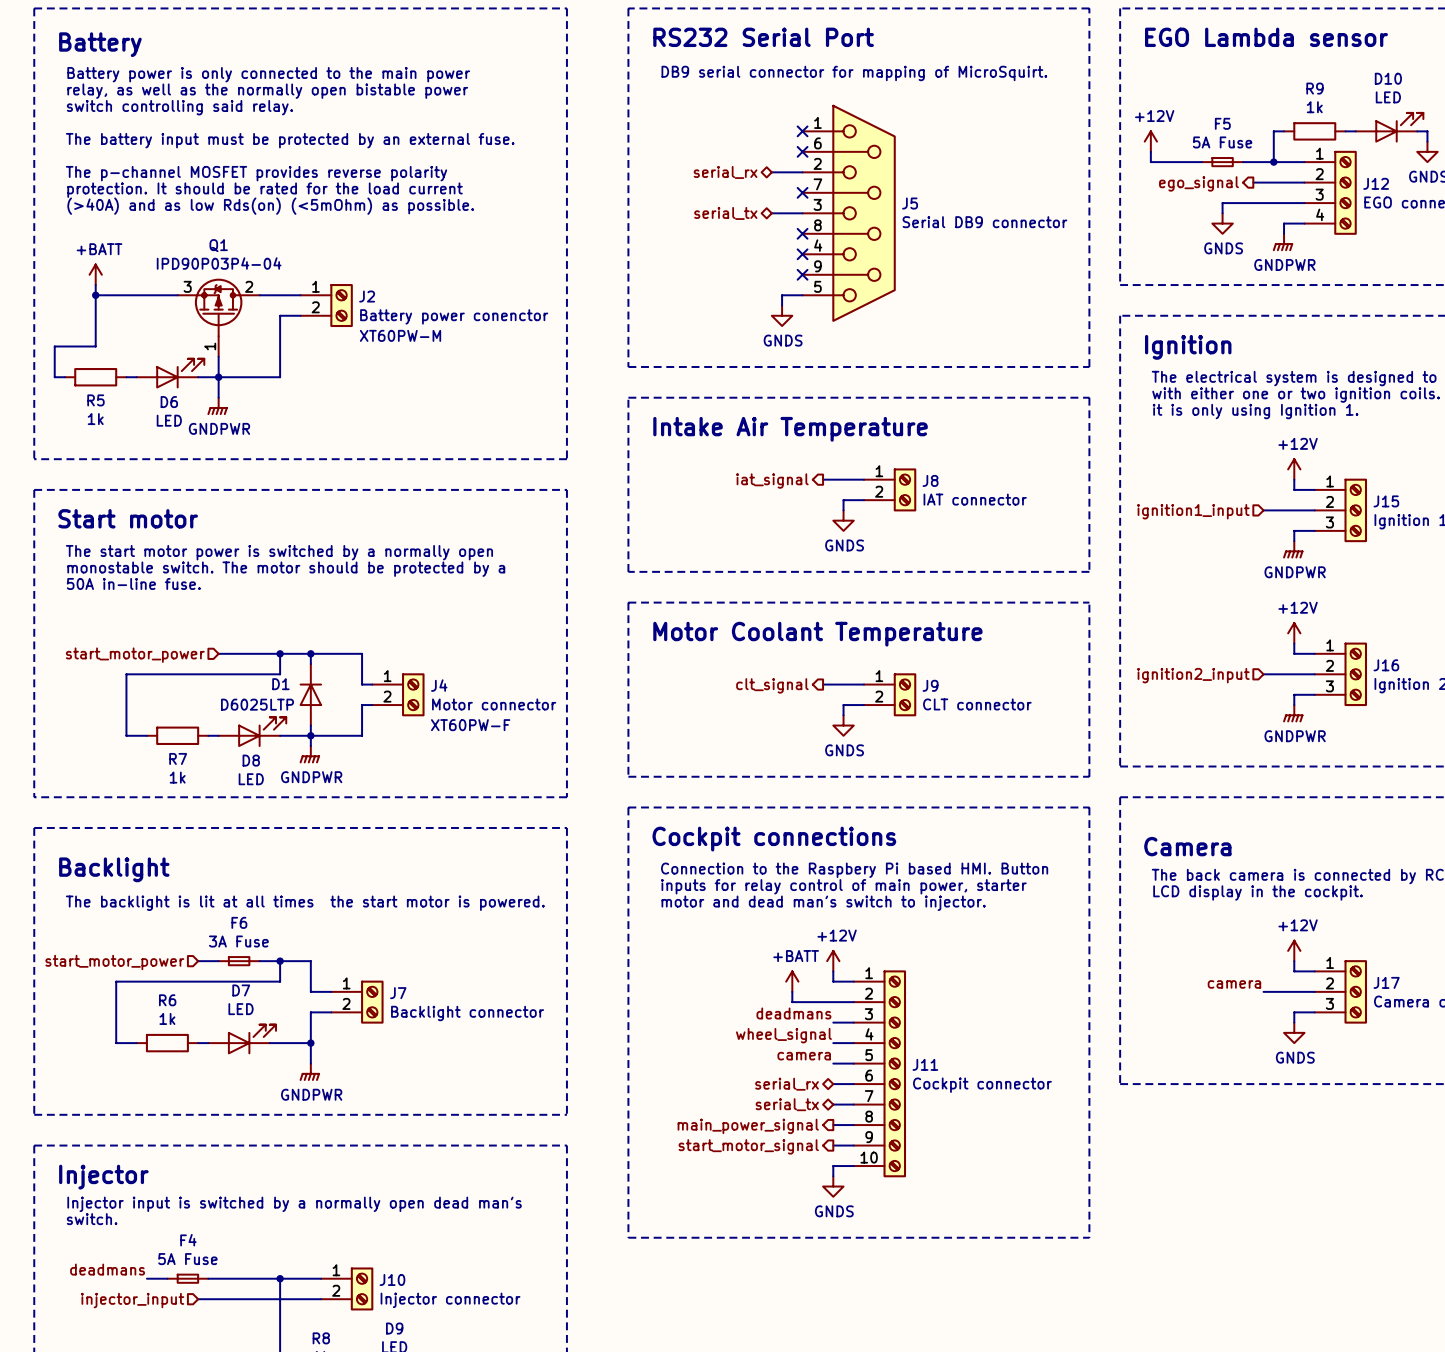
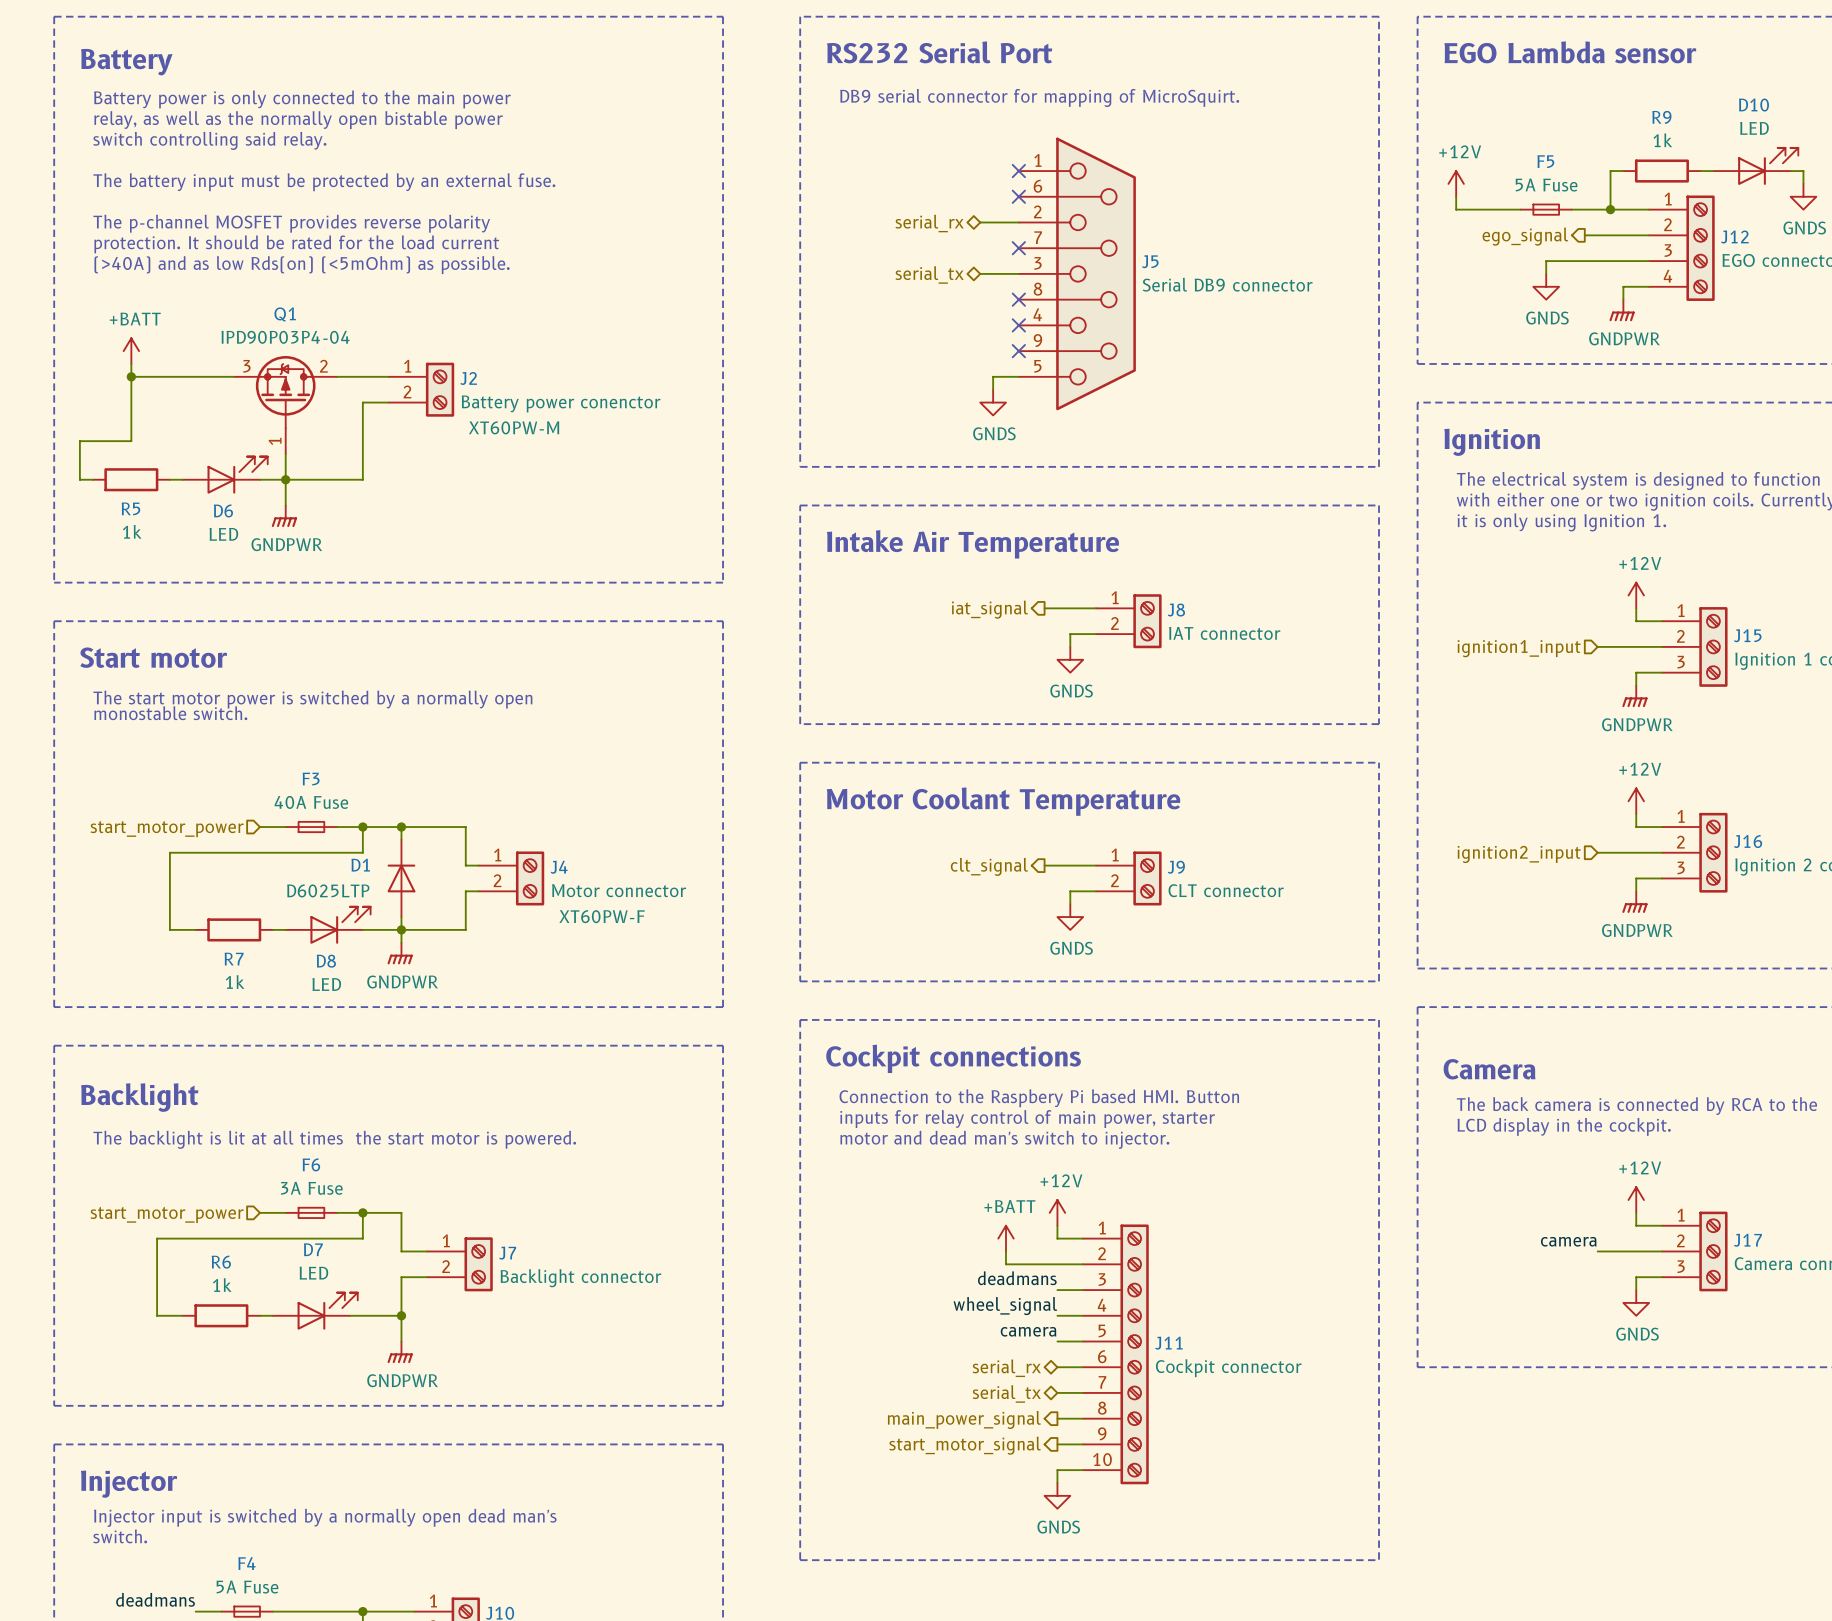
text: monostable switch. The motor should be protected by a (286, 569) -> monostable switch. (170, 713)
text: 50A in-line fuse. (133, 583) -> none
F3: none -> 40A Fuse (311, 827)
hierarchical label position: start_motor_power (135, 655) -> start_motor_power (167, 829)

